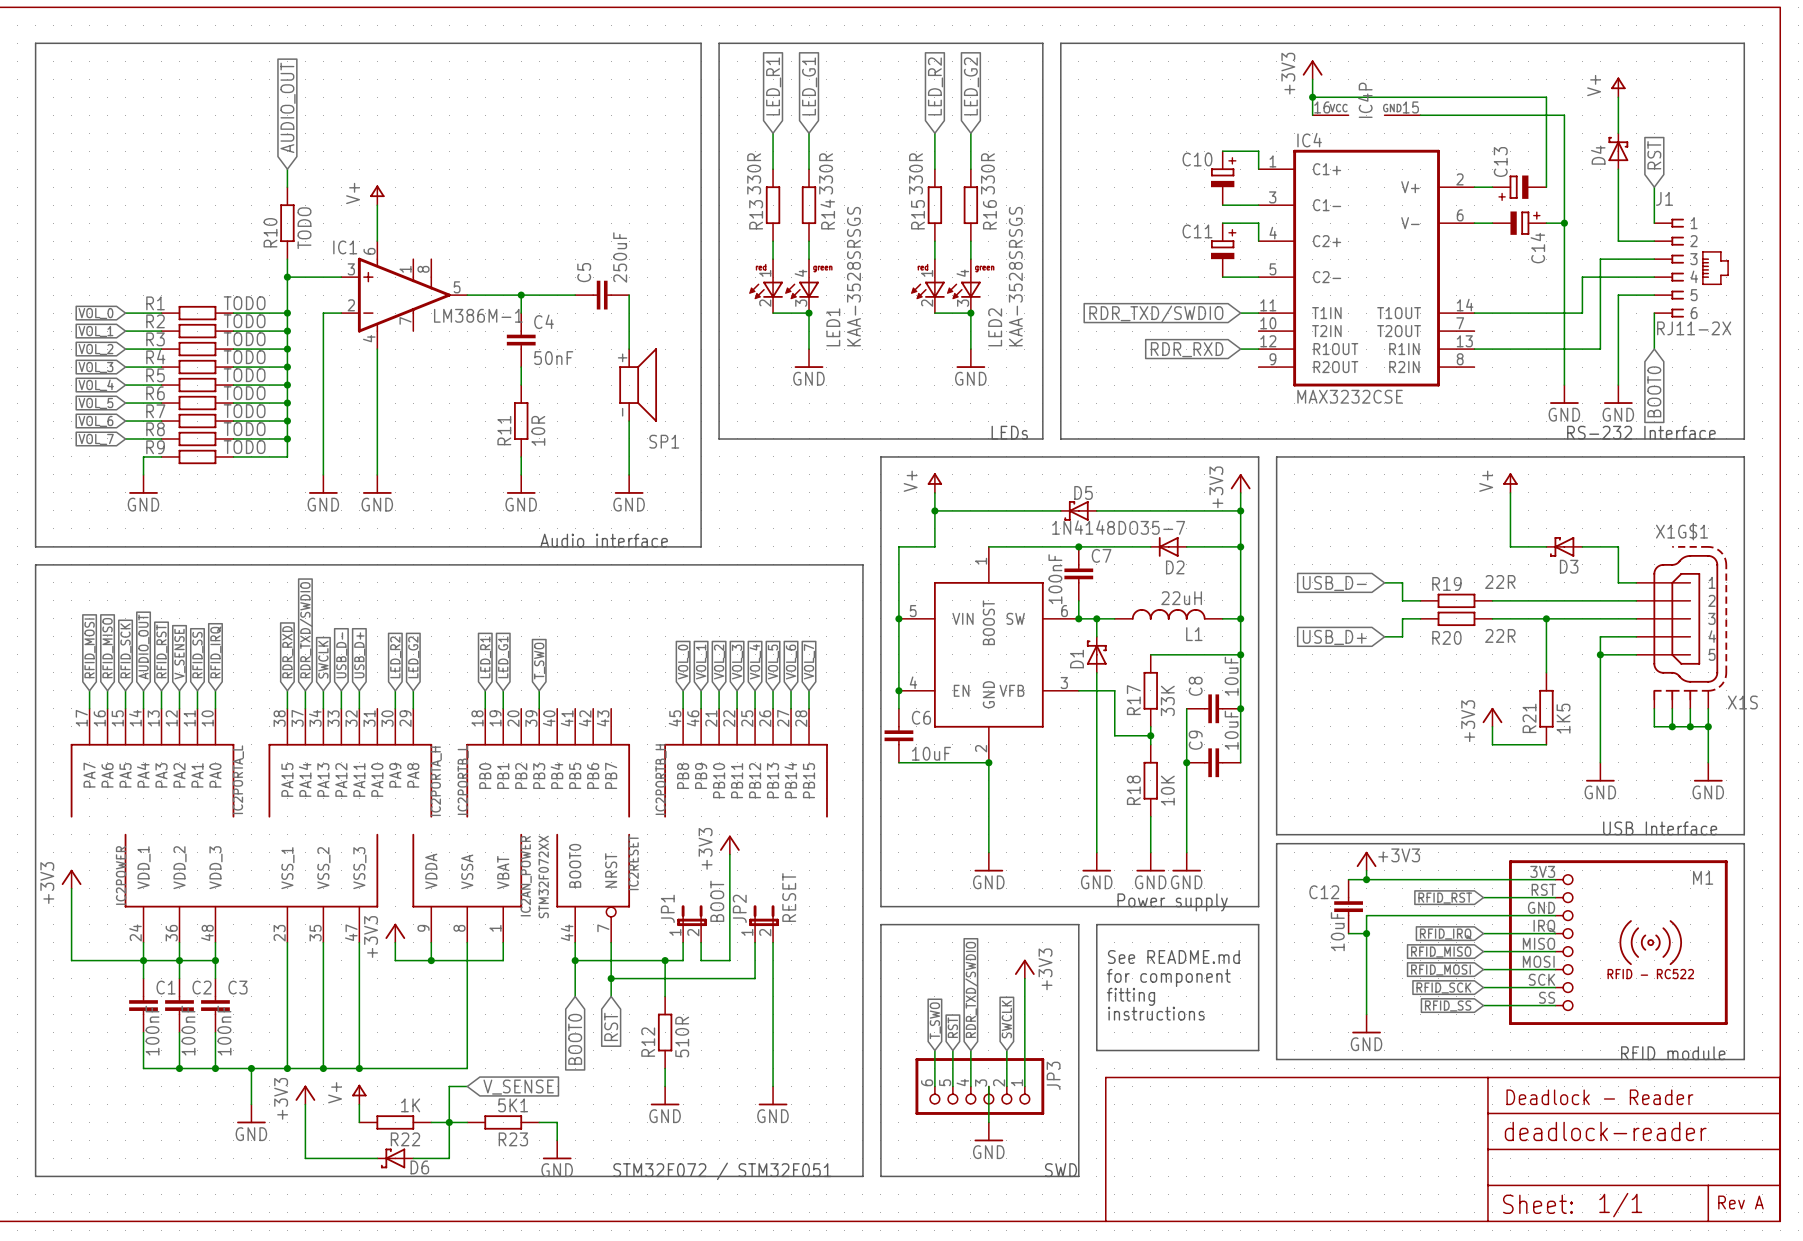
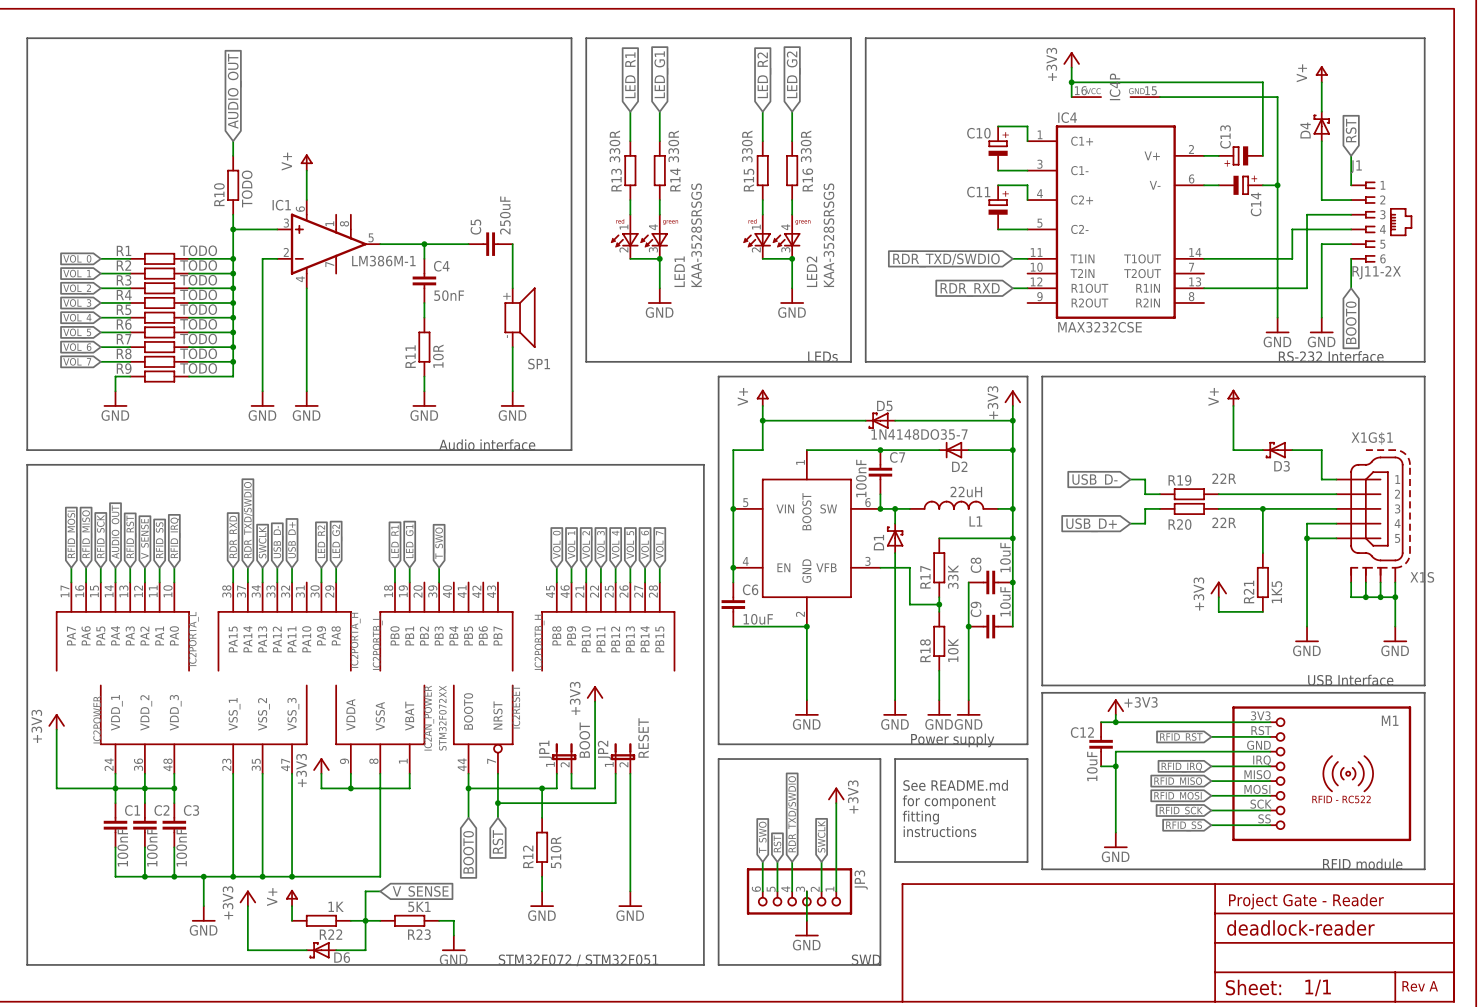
text: Deadlock - Reader (1599, 1097) -> Project Gate - Reader (1306, 901)

